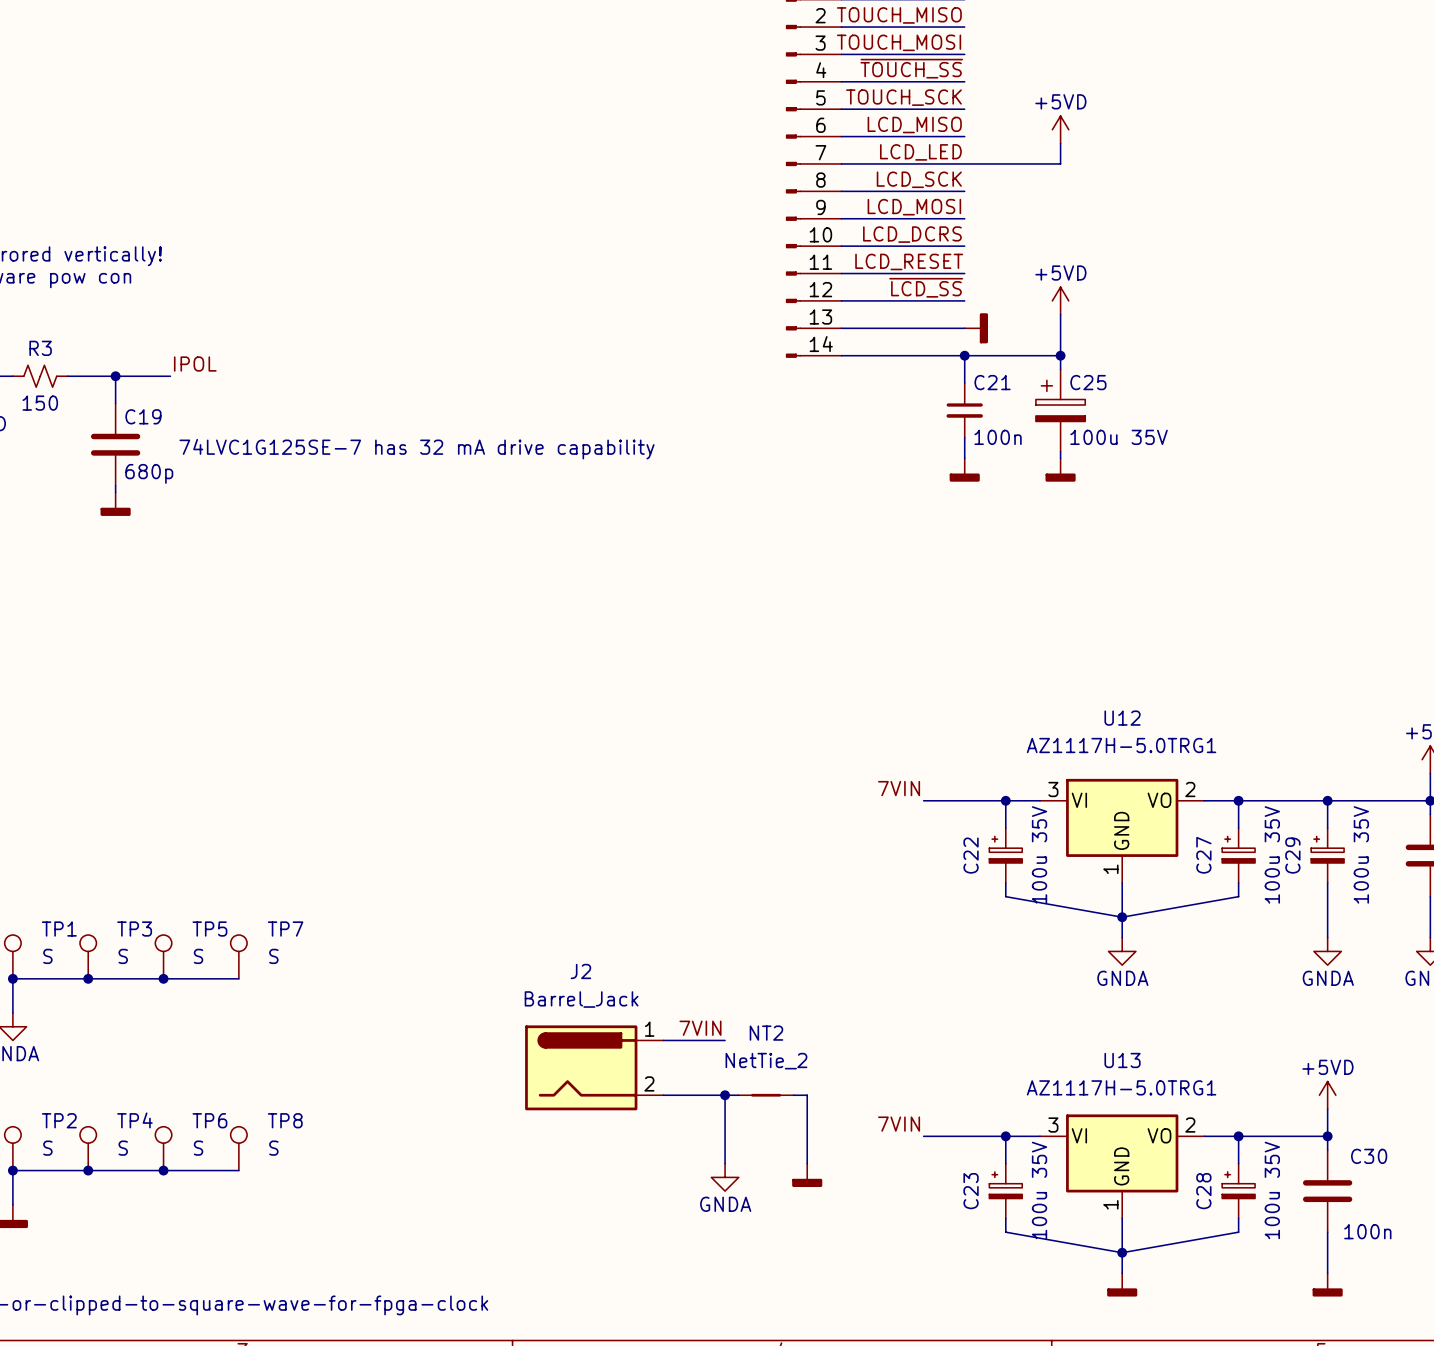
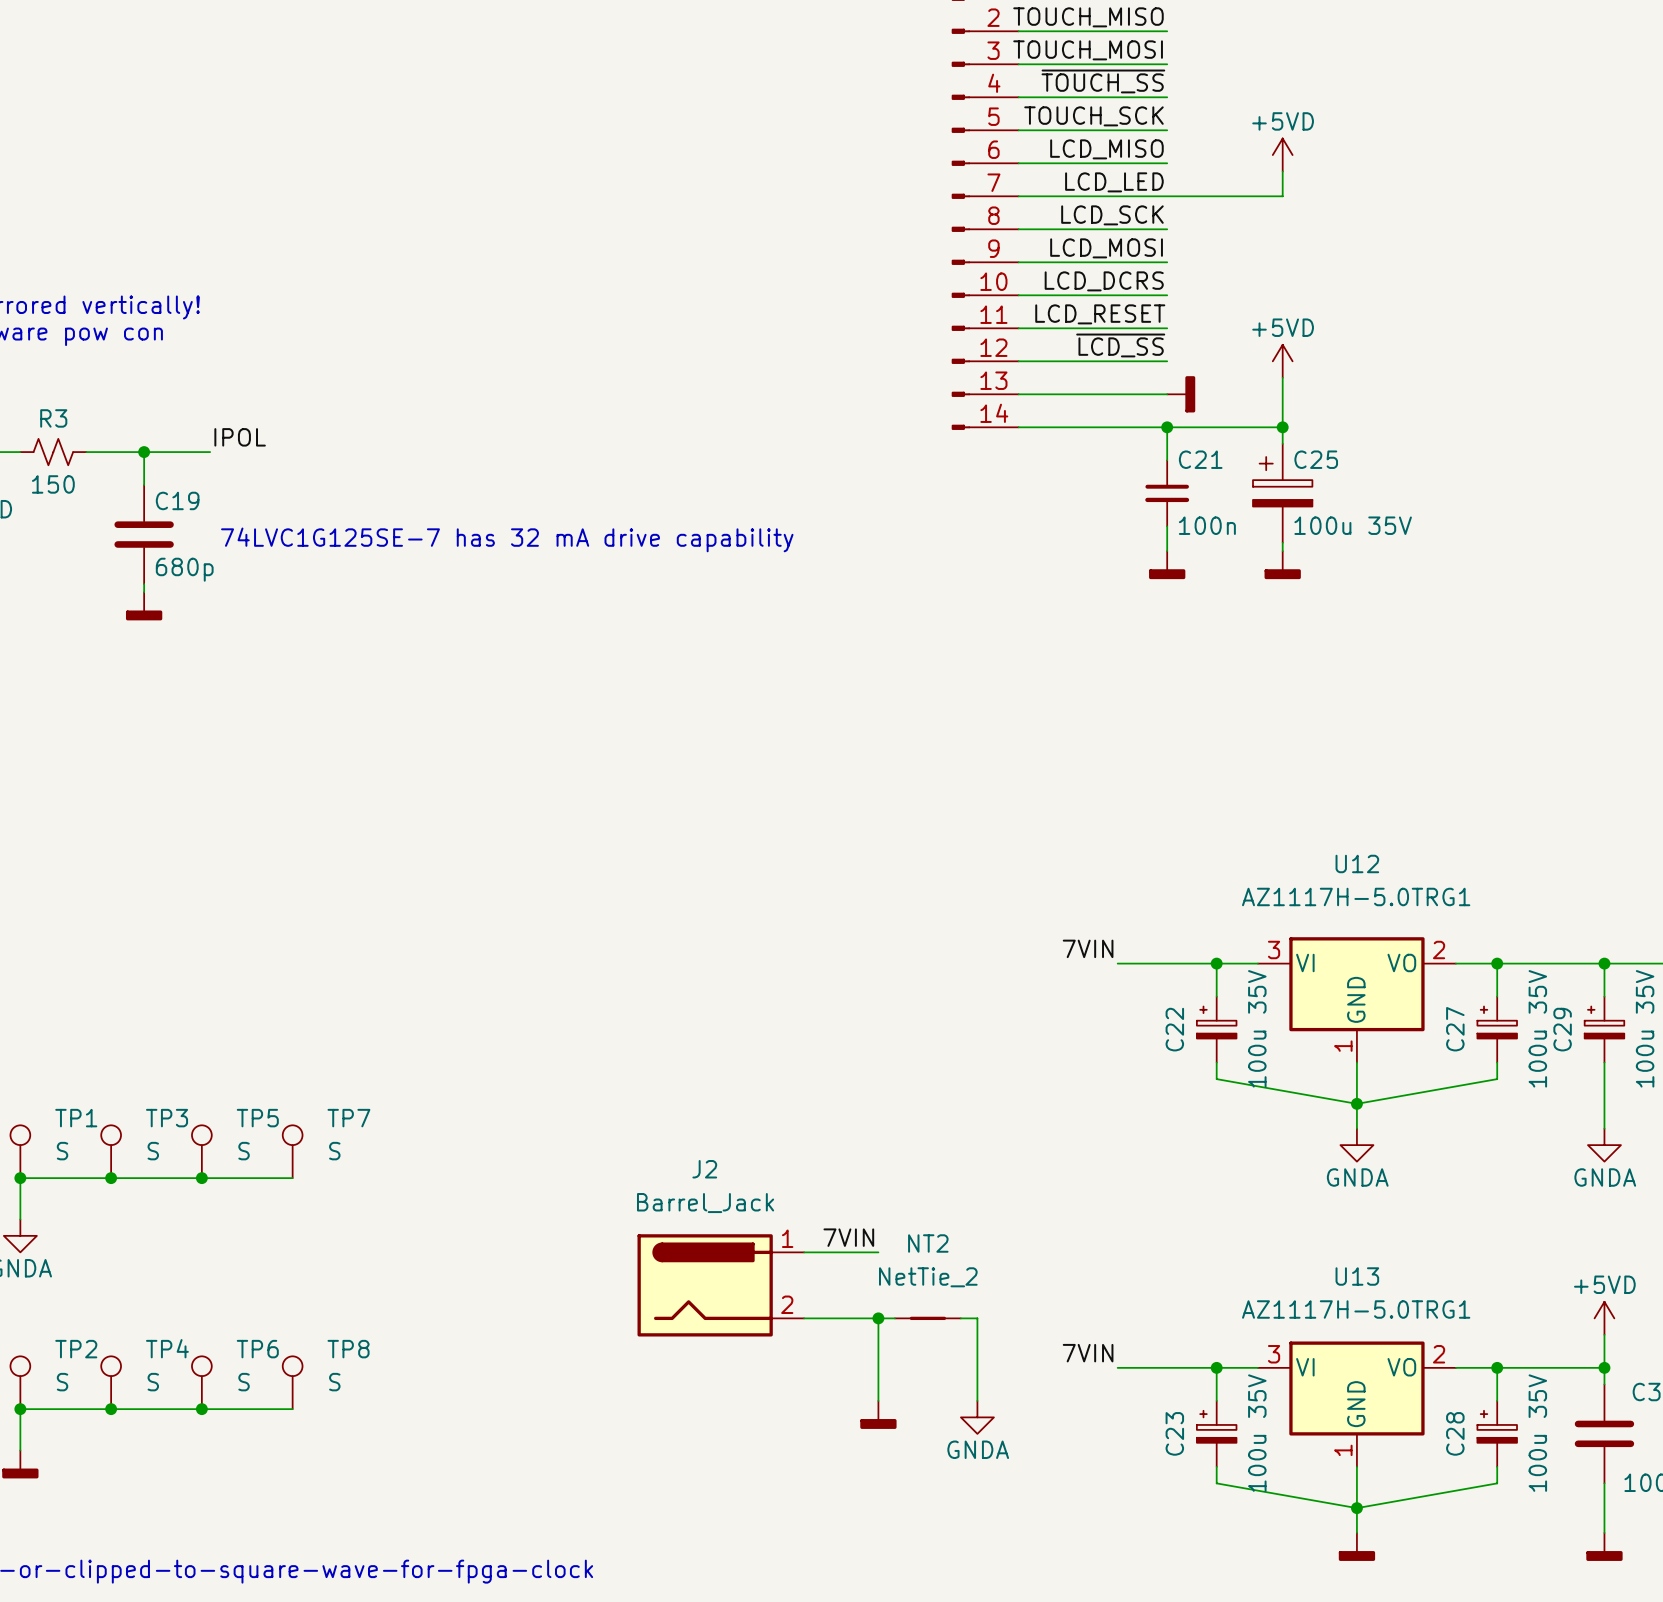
power symbol shape: [711, 1163, 739, 1192] -> [860, 1400, 897, 1429]
power symbol shape: [792, 1163, 823, 1188] -> [960, 1400, 994, 1434]
power symbol text: GNDA (725, 1204) -> none
power symbol text: none -> GNDA (978, 1449)

